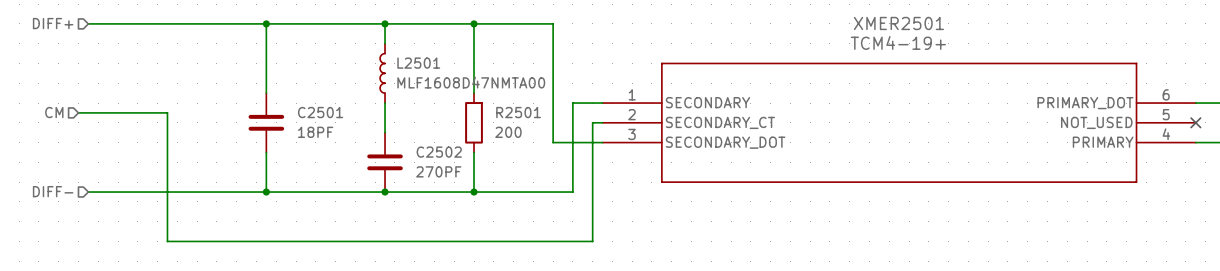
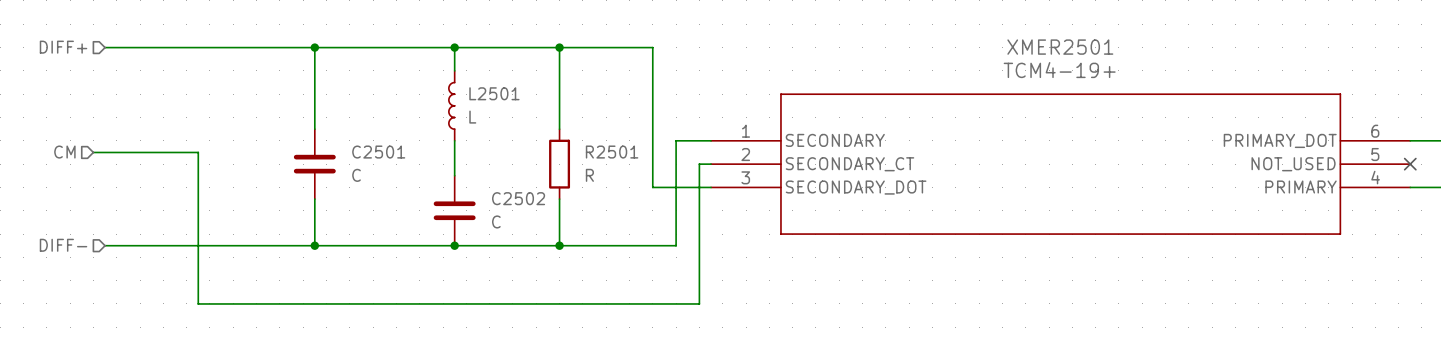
L2501 value: MLF1608D47NMTA00 (471, 82) -> L (472, 117)
C2501 value: 18PF (315, 132) -> C (356, 175)
R2501 value: 200 (508, 132) -> R (589, 175)
C2502 value: 270PF (438, 171) -> C (496, 221)

